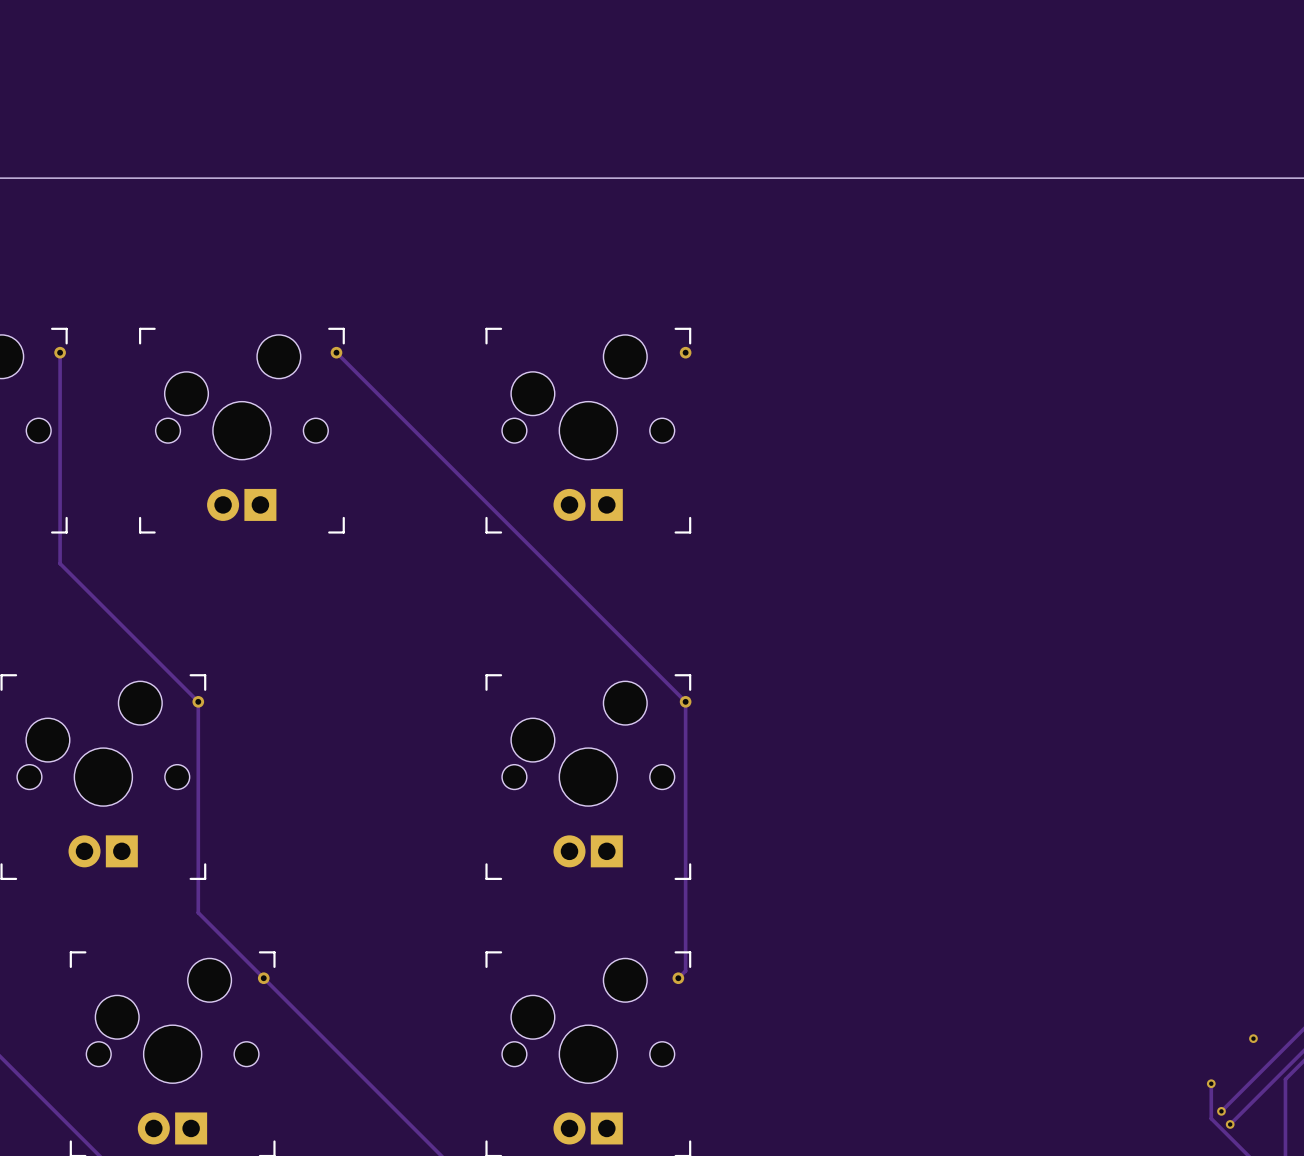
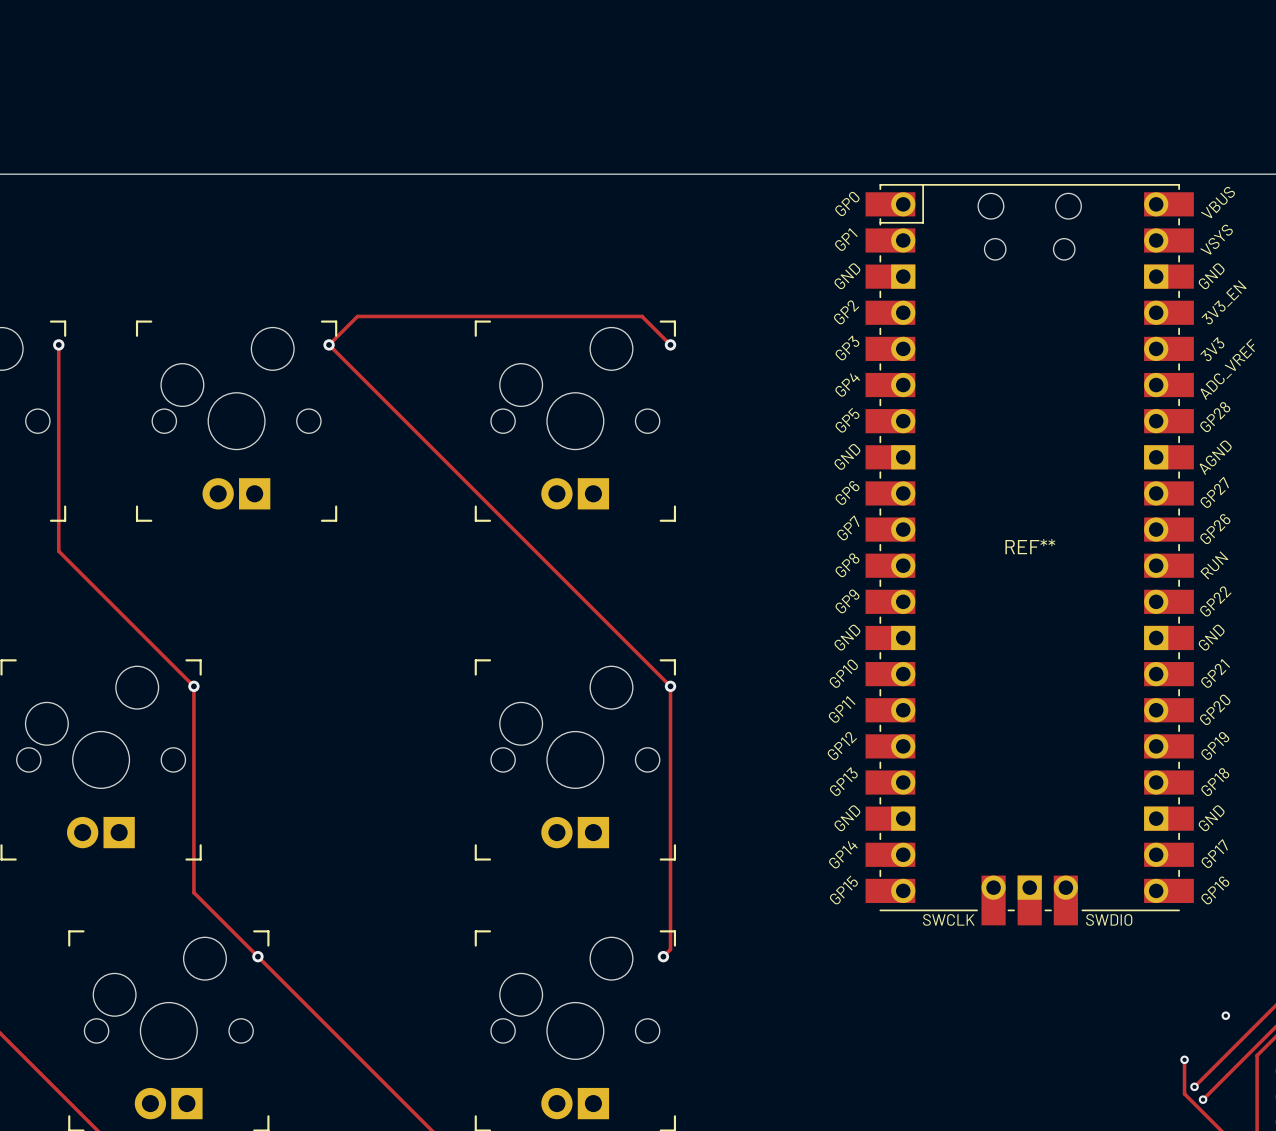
track: none -> (329, 344) (357, 316) (642, 316) (670, 344)
REF**: none -> (1029, 554)

